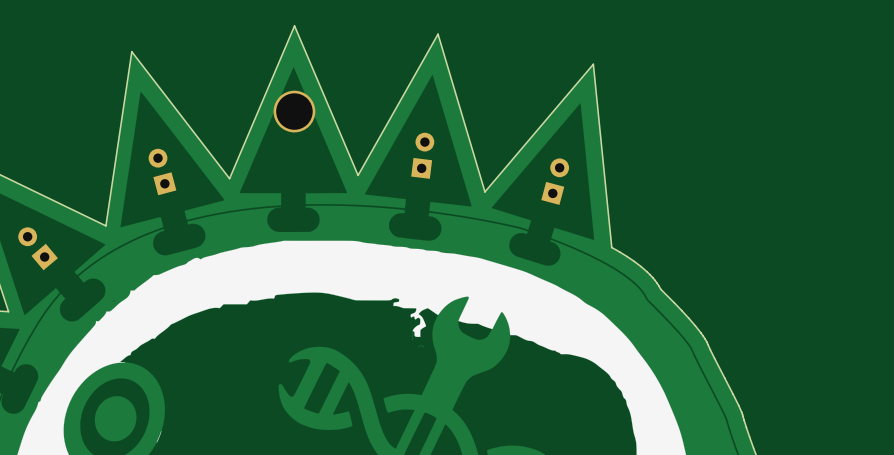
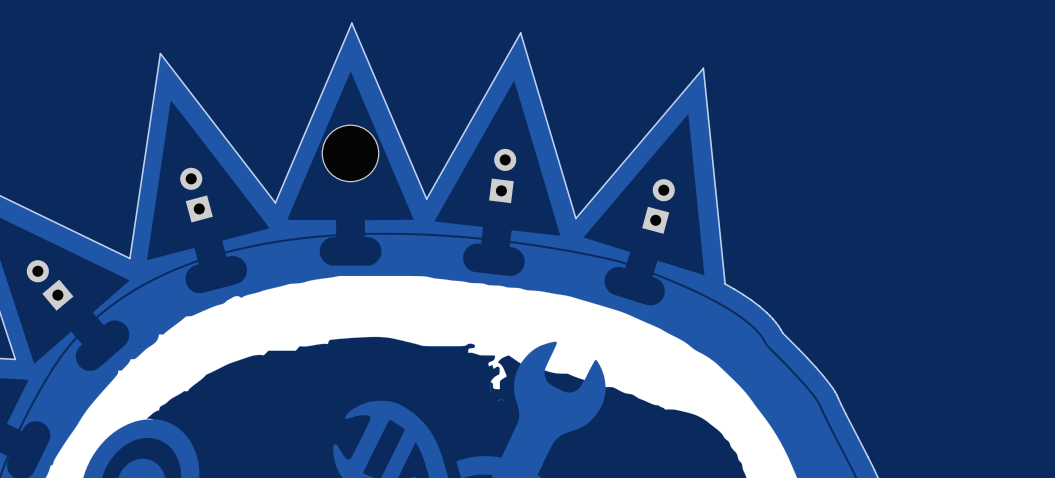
part: (294, 111) -> none
part: none -> (350, 153)

